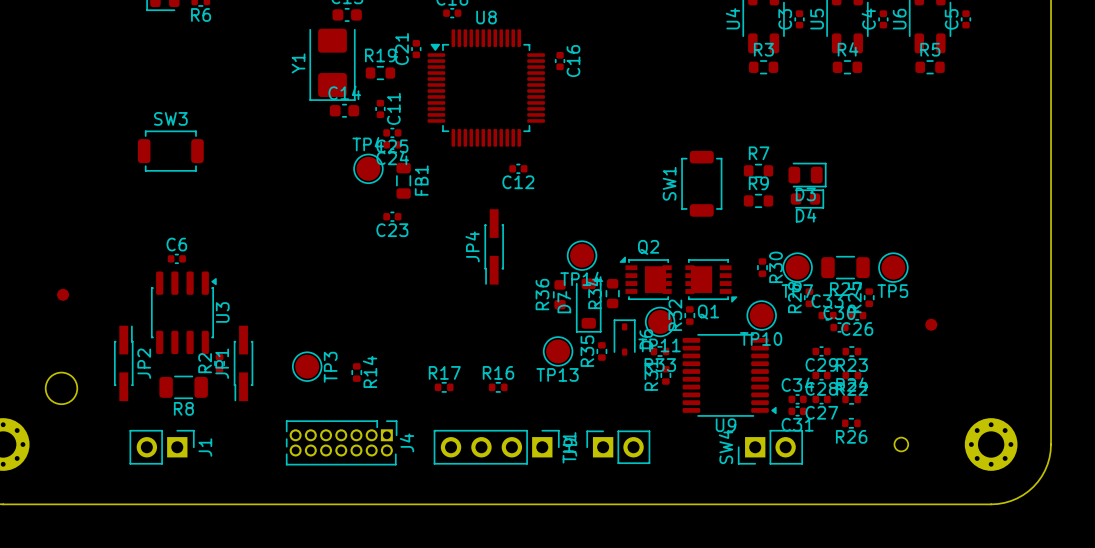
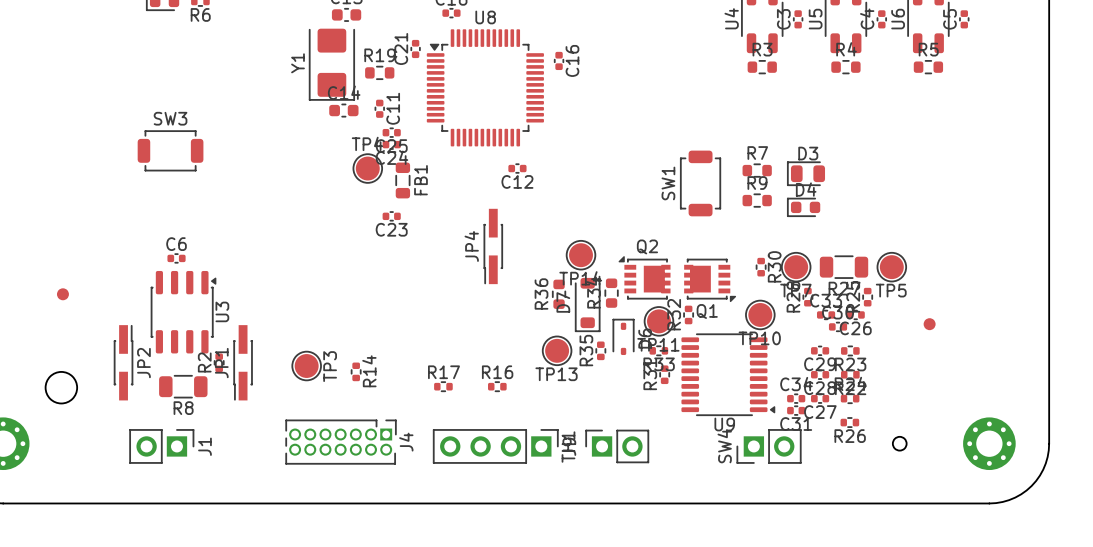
D3 rotation: 0° (807, 175) -> 180° (806, 173)
D4 rotation: 0° (807, 199) -> 180° (803, 207)

